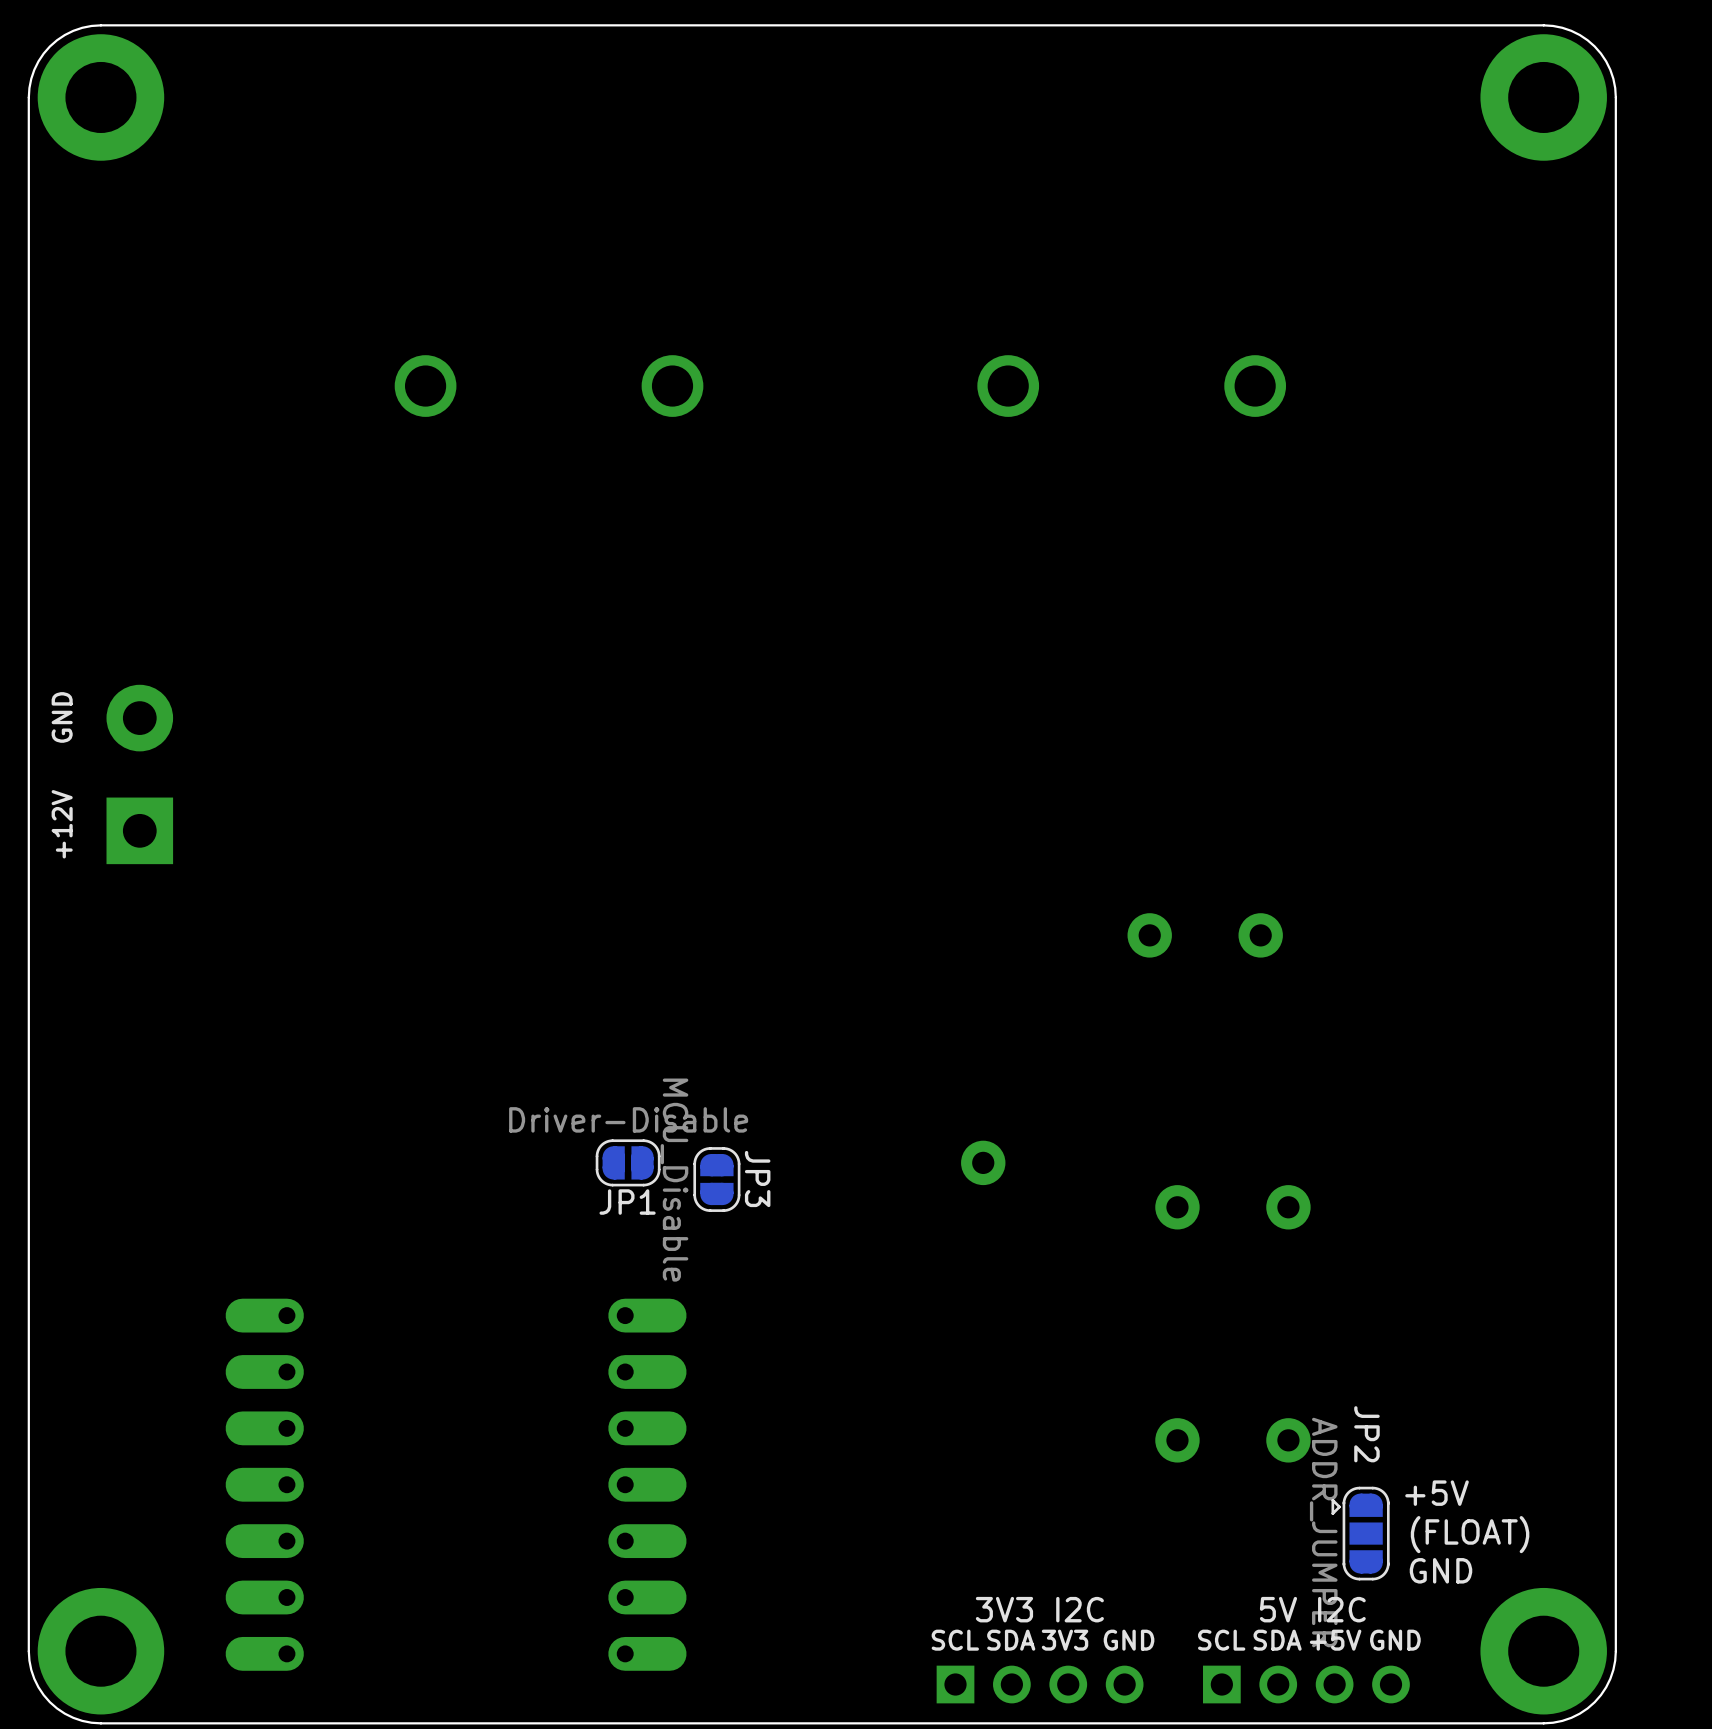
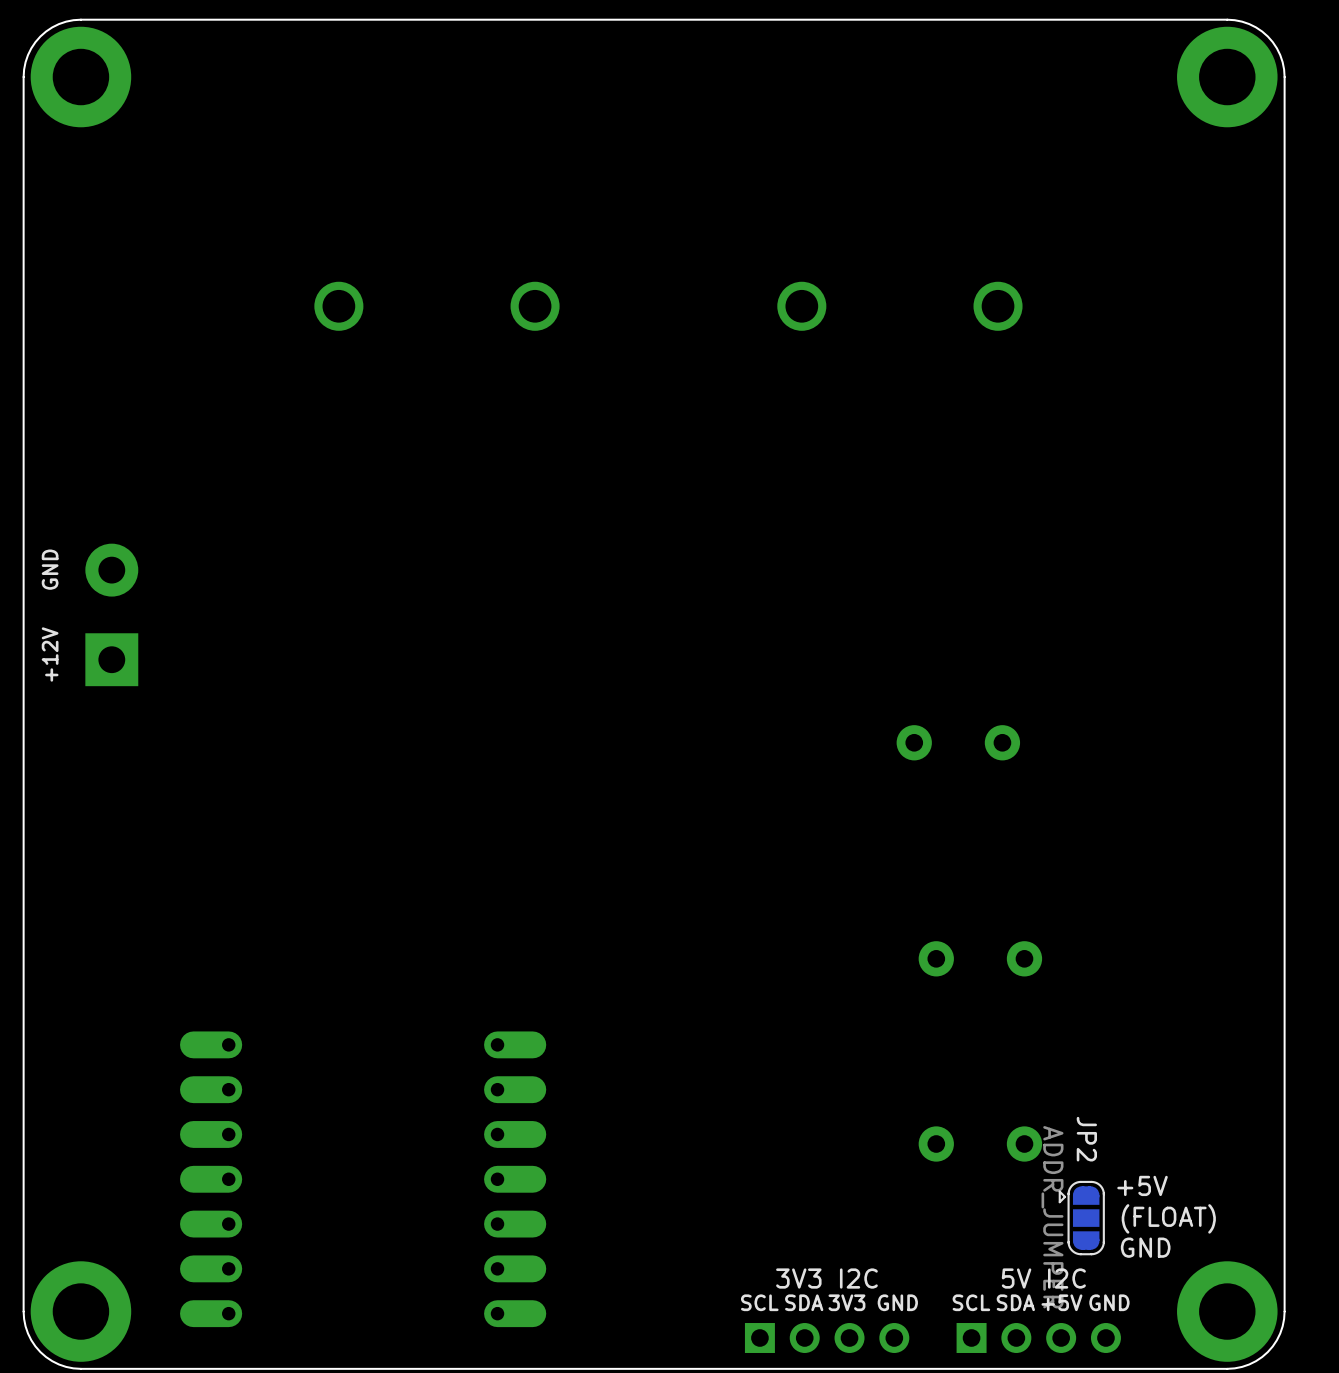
JP1: Driver-Disable (628, 1162) -> none
part: (983, 1162) -> none
JP3: MCU_Disable (716, 1179) -> none

